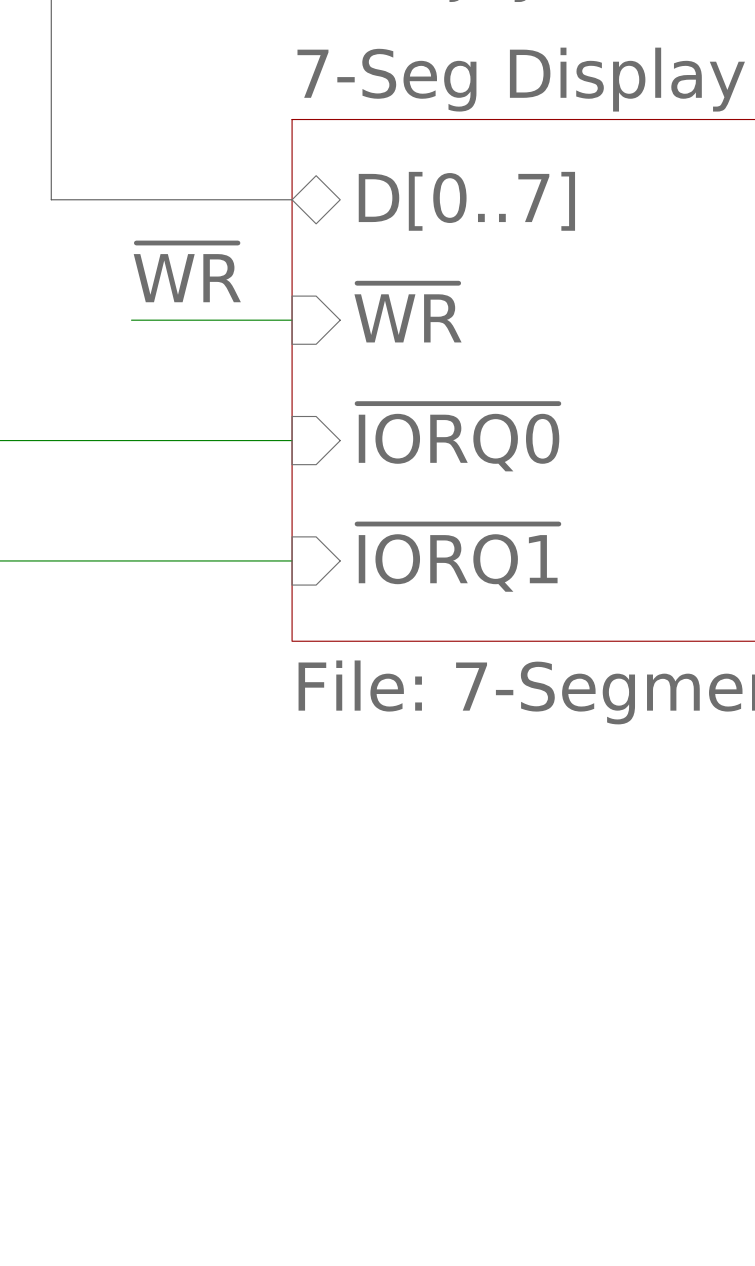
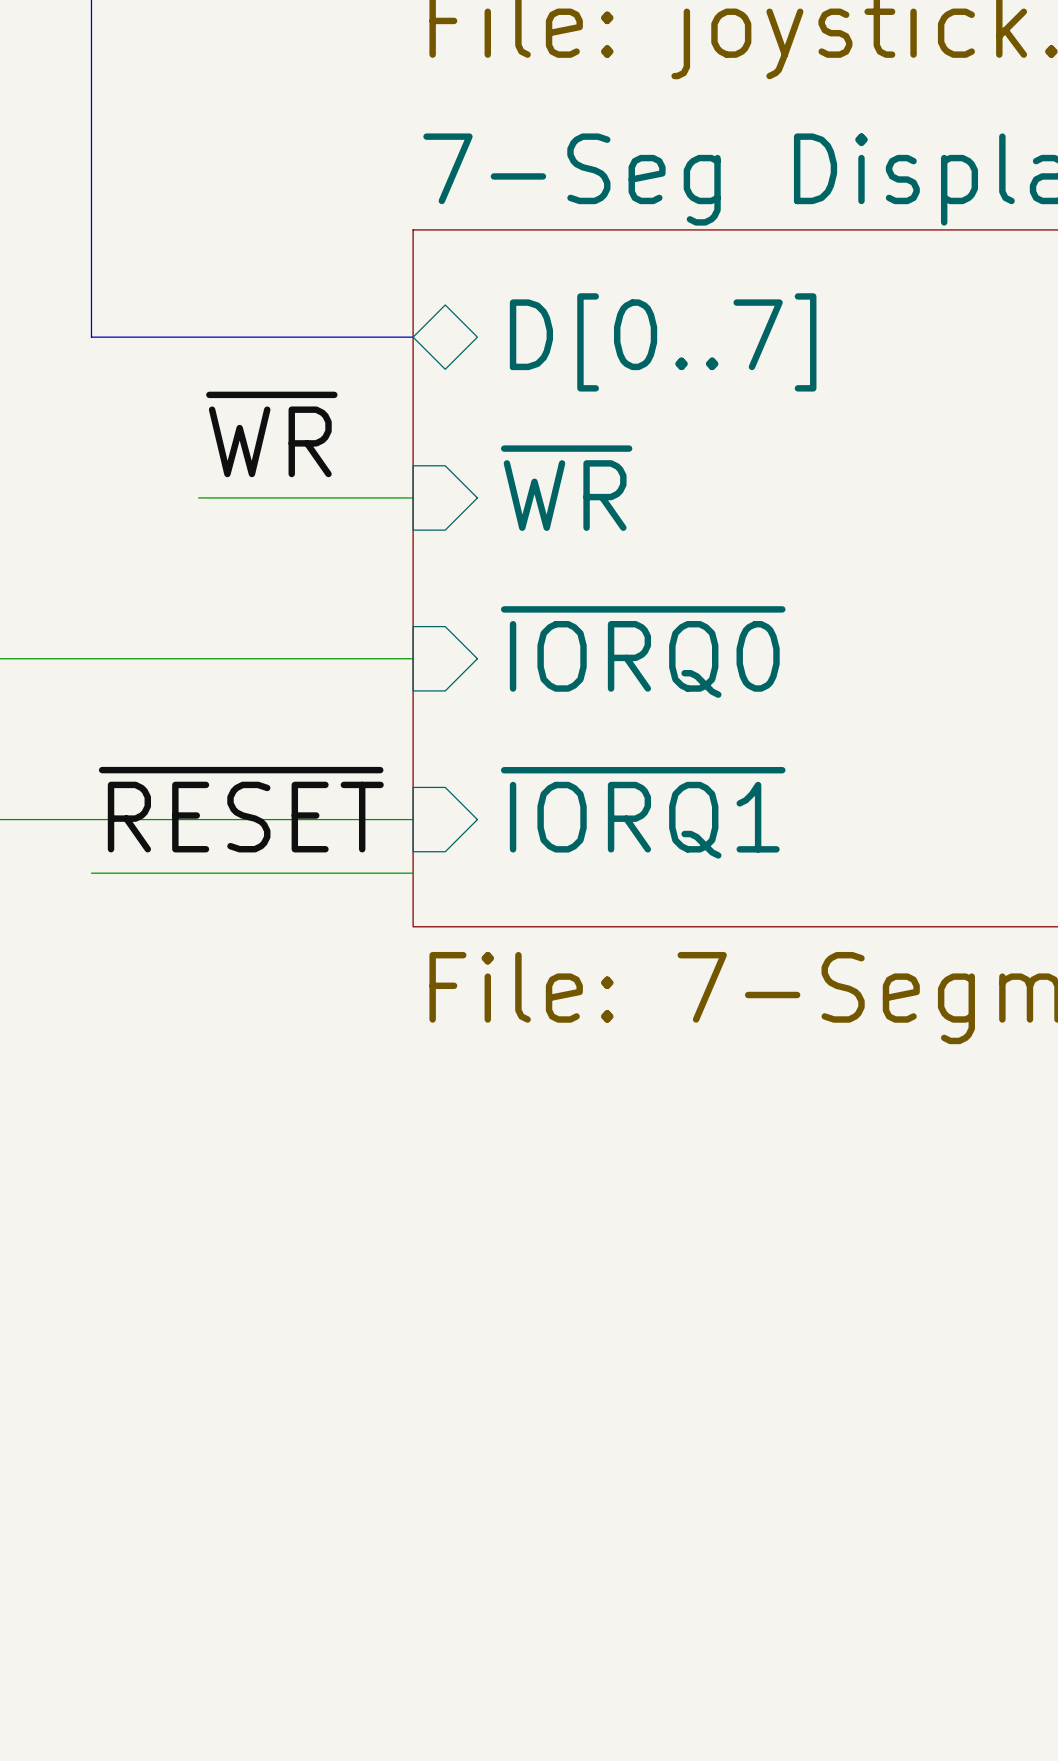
label: none -> ~{RESET} (241, 809)
wire: none -> (91, 873) (413, 873)

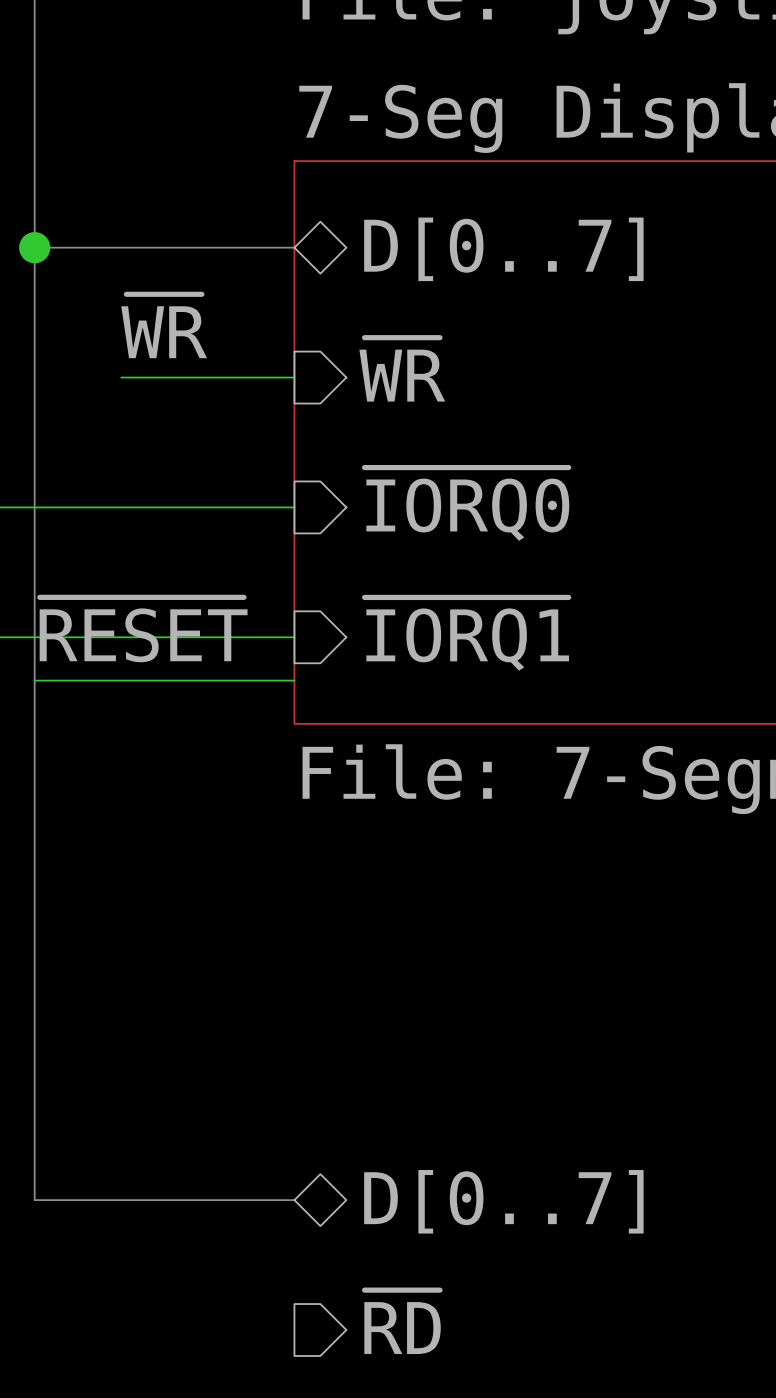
bus: none -> (34, 247) (34, 1200) (294, 1200)
junction: none -> (34, 247)
sheet pin: none -> D[0..7] (503, 1201)
sheet pin: none -> ~{RD} (402, 1322)

